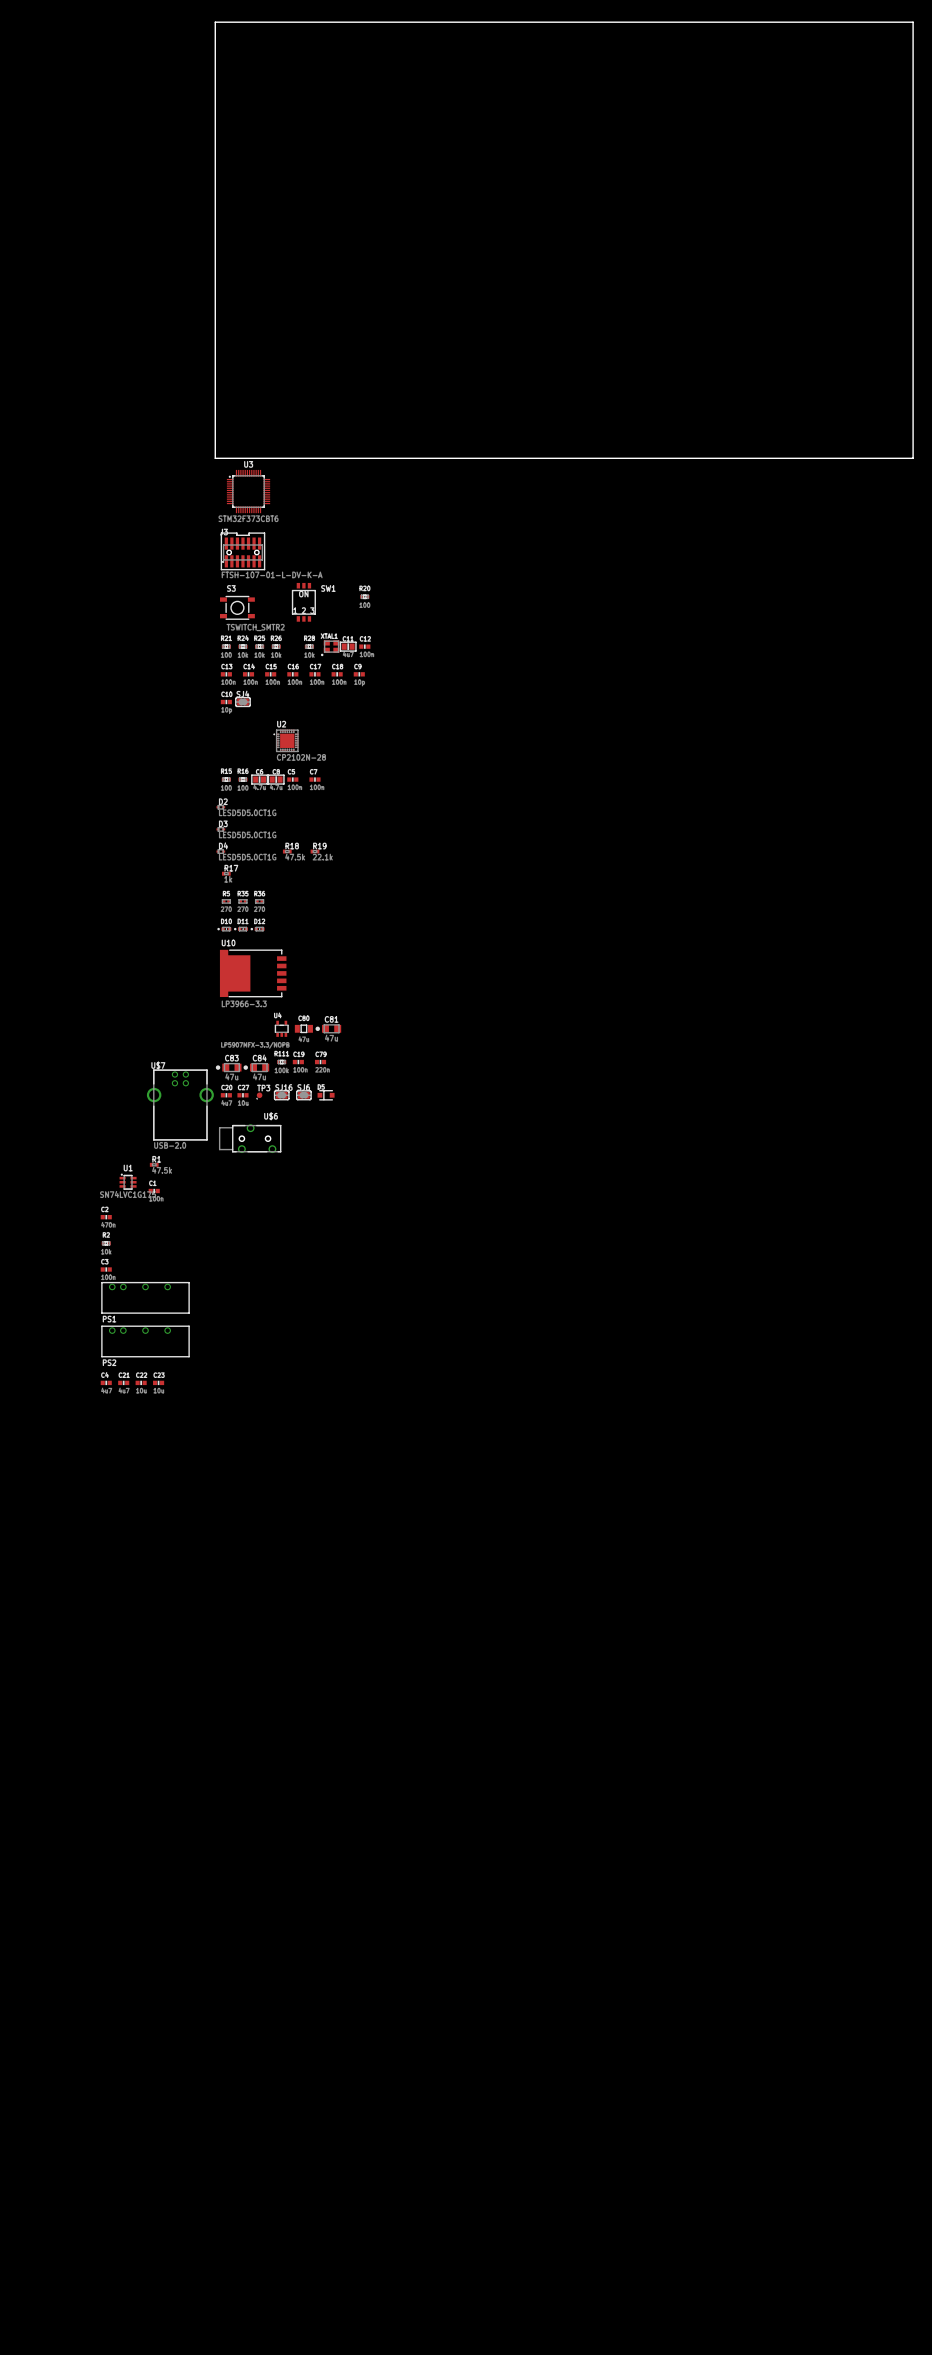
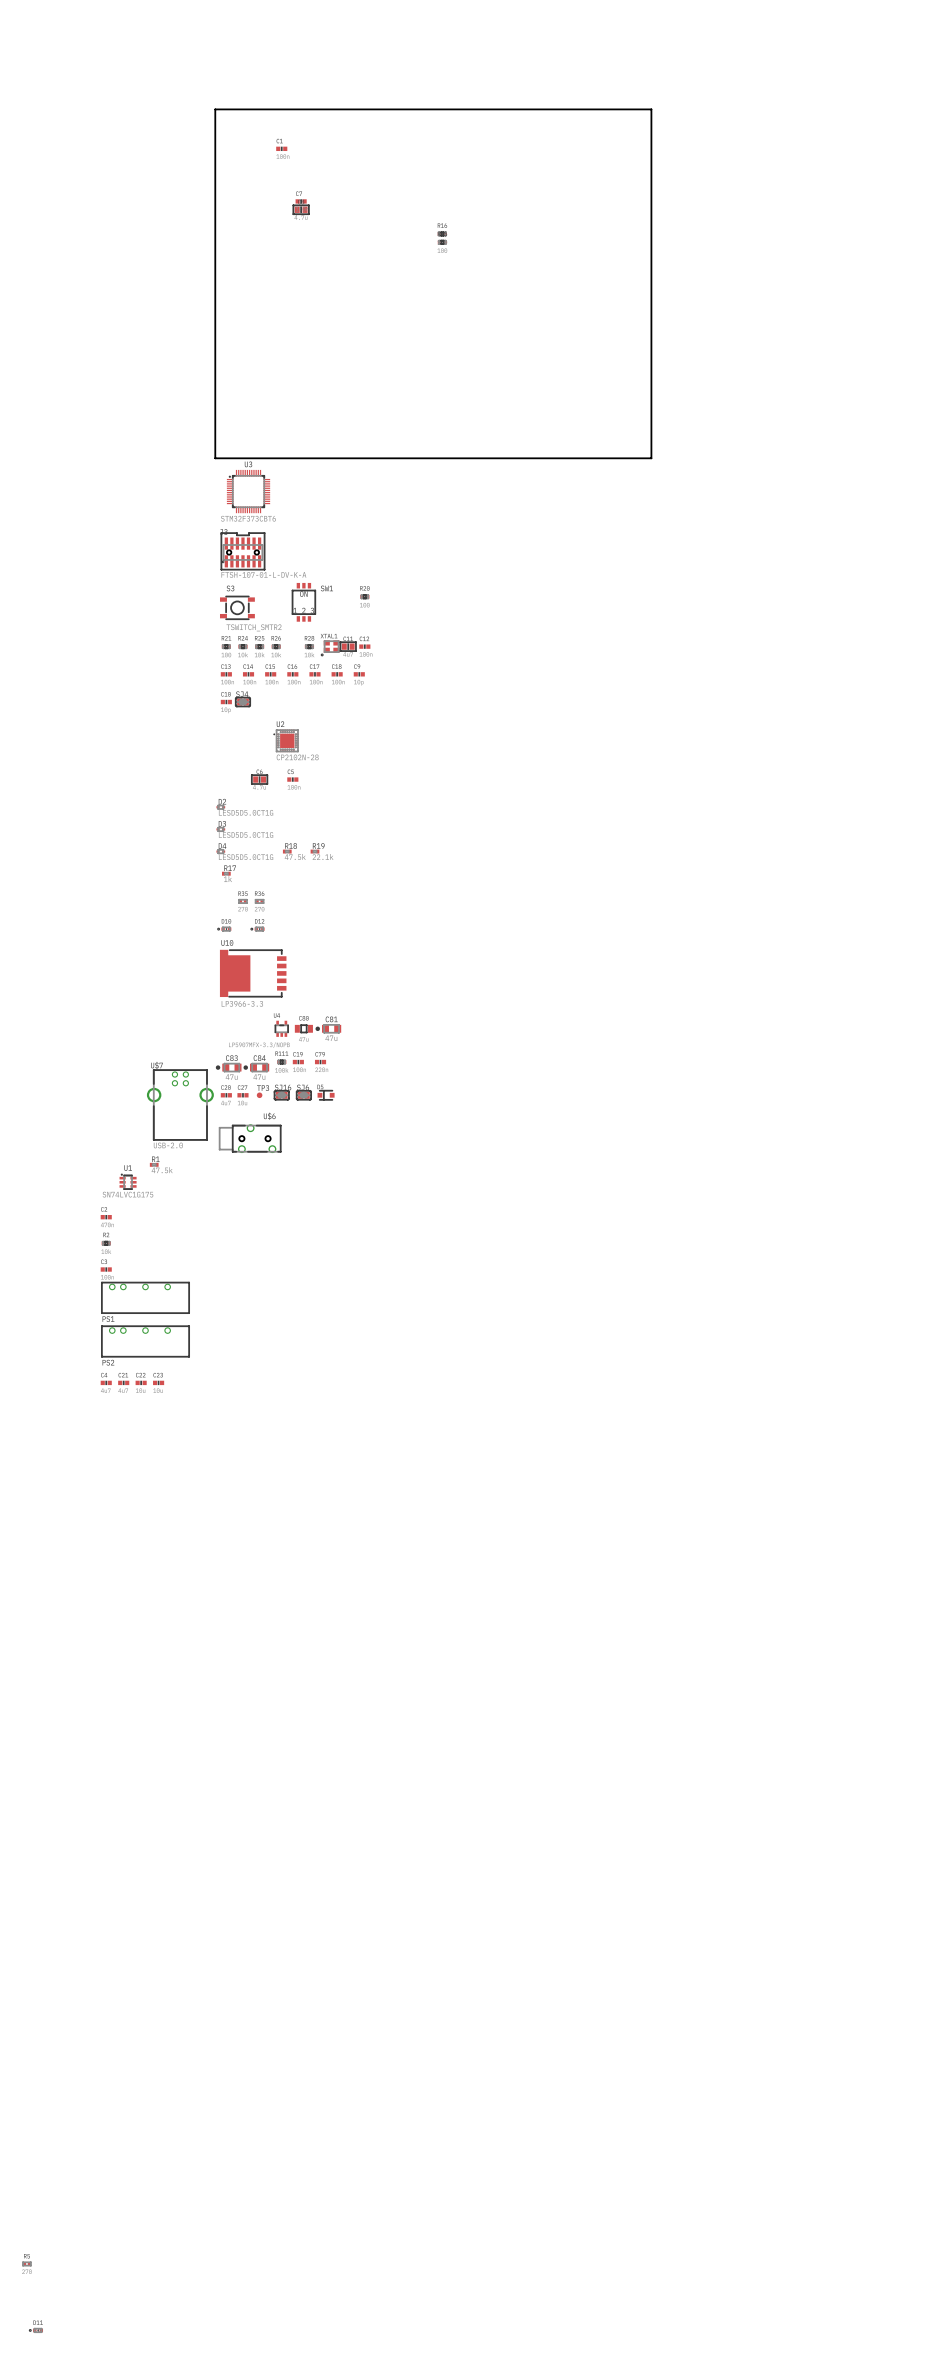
board edge: (215, 109) (215, 22) (913, 22) (913, 458) (651, 458) -> (215, 109) (651, 109) (651, 458)
part position: (226, 779) -> (442, 242)
part position: (242, 779) -> (442, 233)
part position: (276, 779) -> (301, 209)
part position: (314, 779) -> (301, 201)
part position: (226, 901) -> (26, 2263)
part position: (241, 929) -> (36, 2330)
part position: (154, 1191) -> (281, 148)

